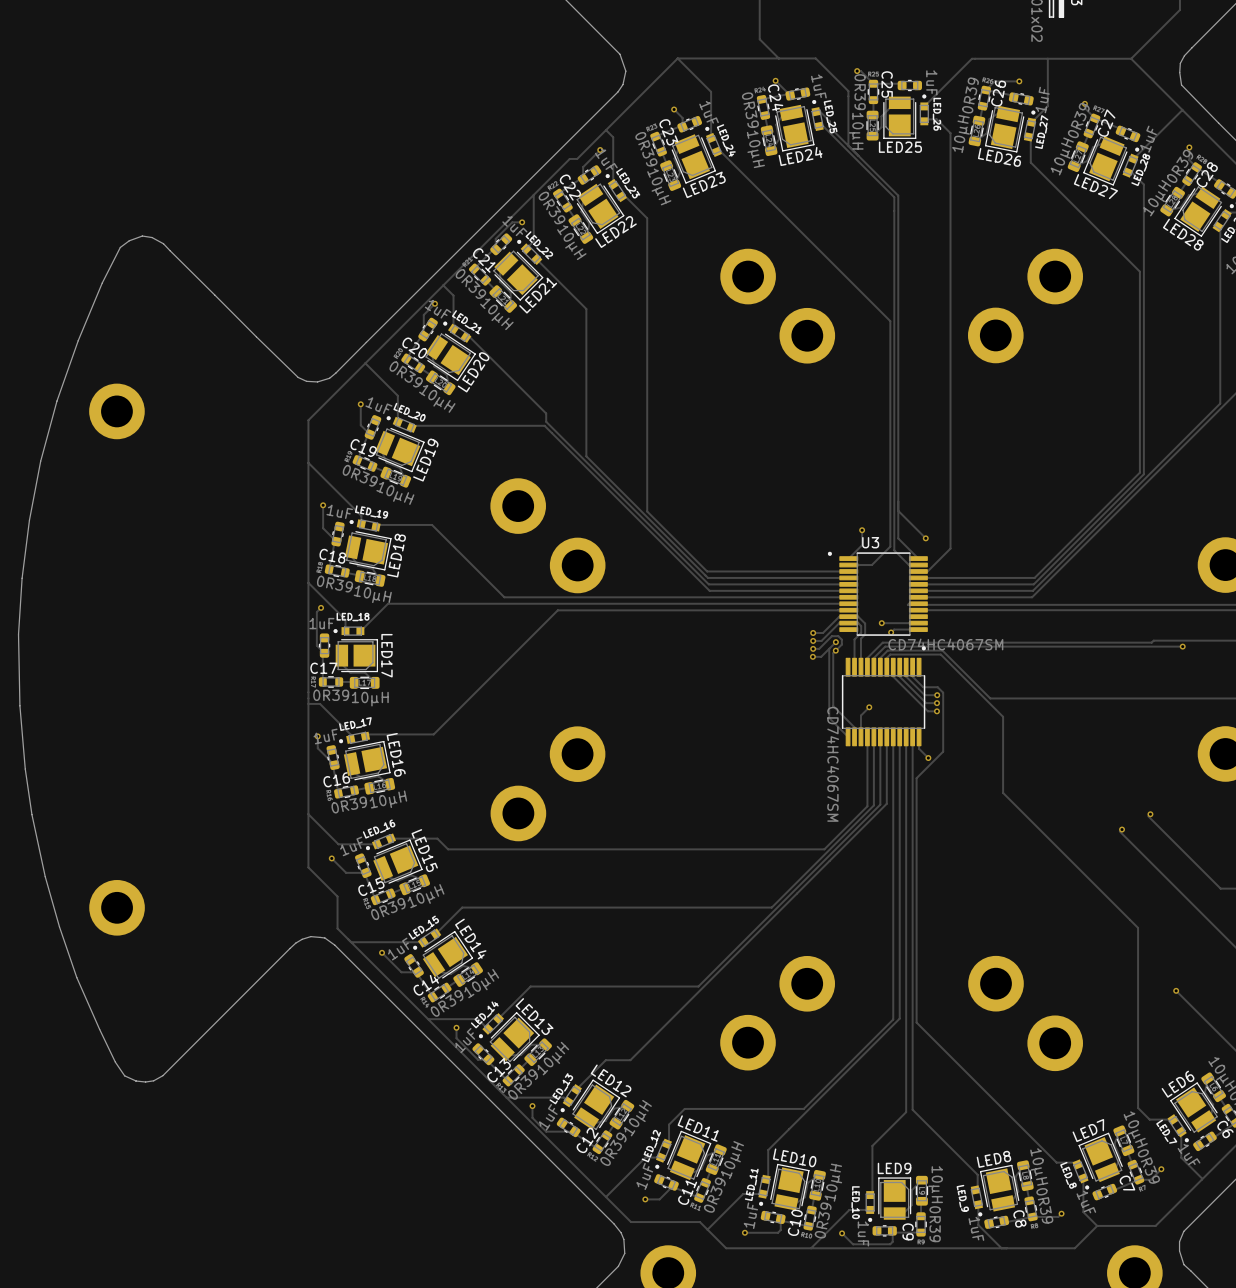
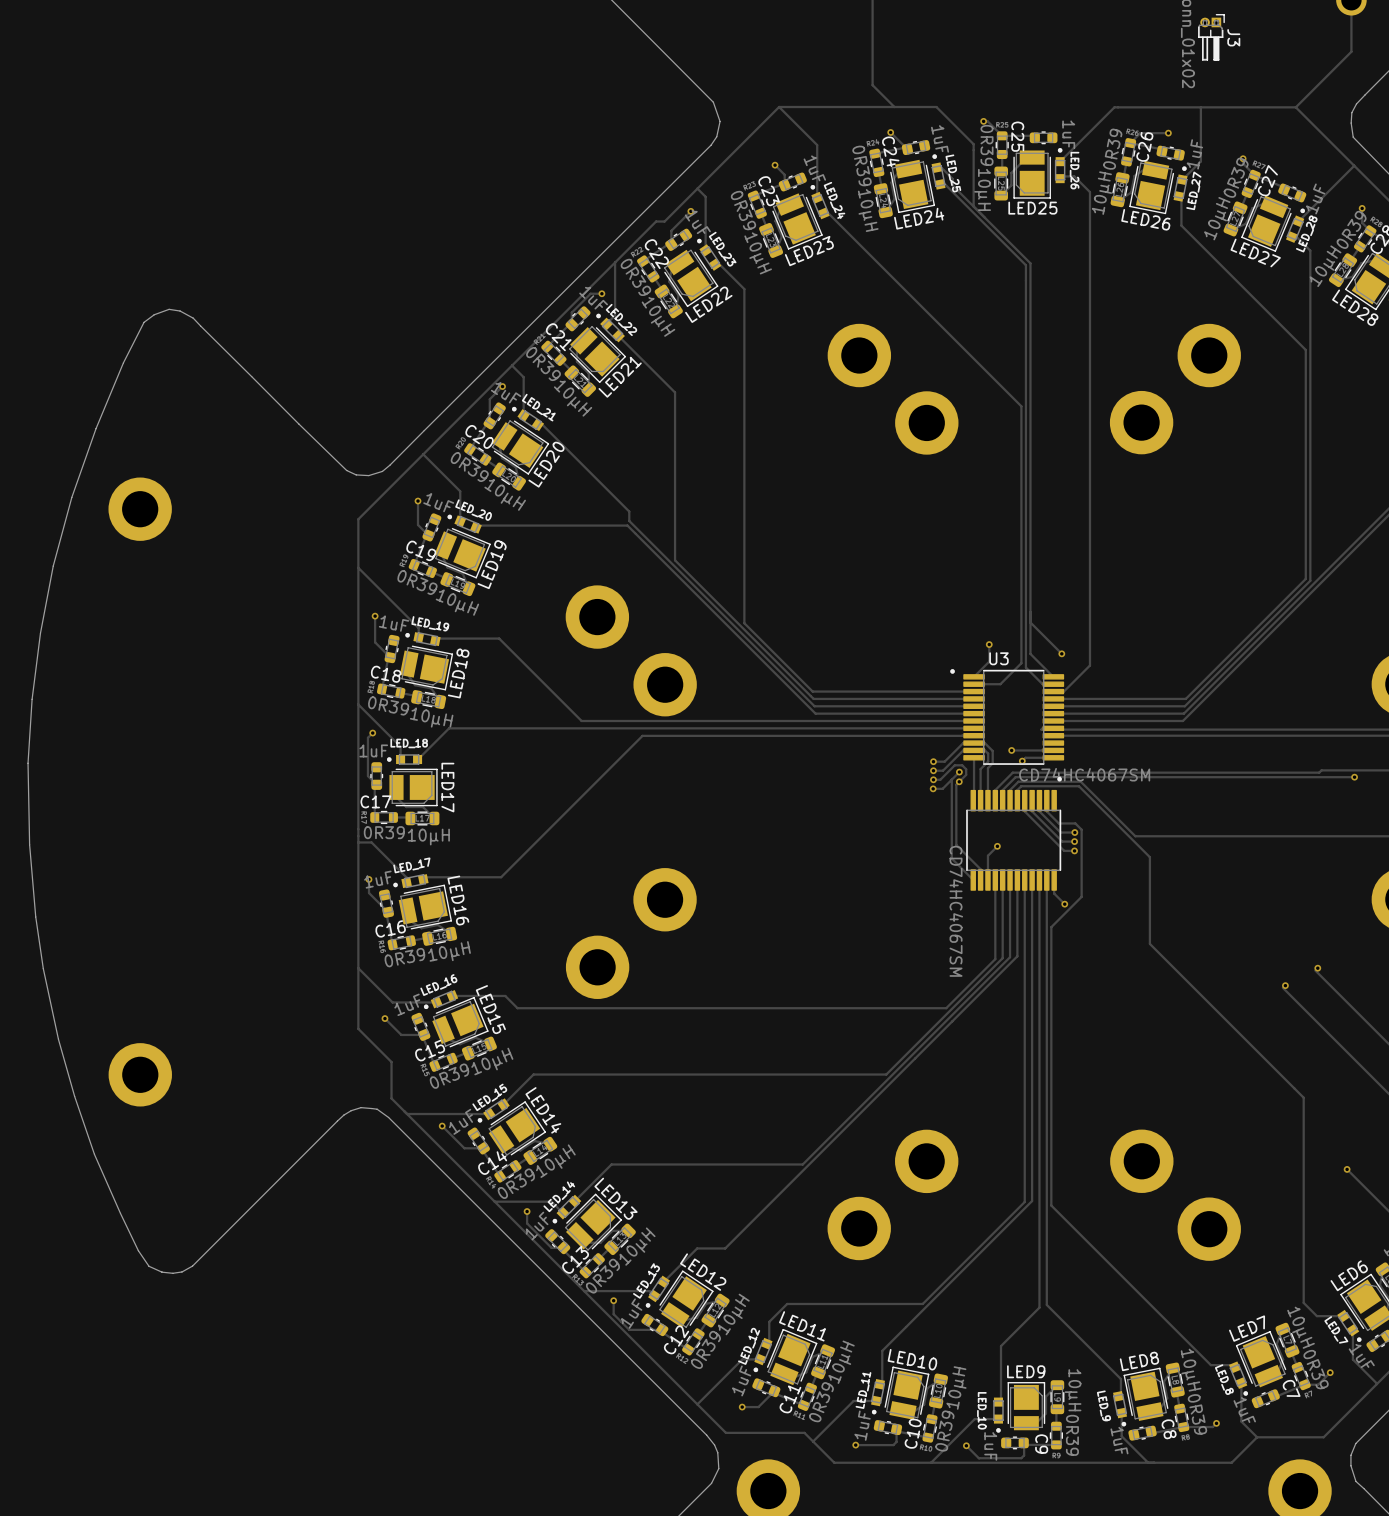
track: none -> (974, 757) (974, 799)

